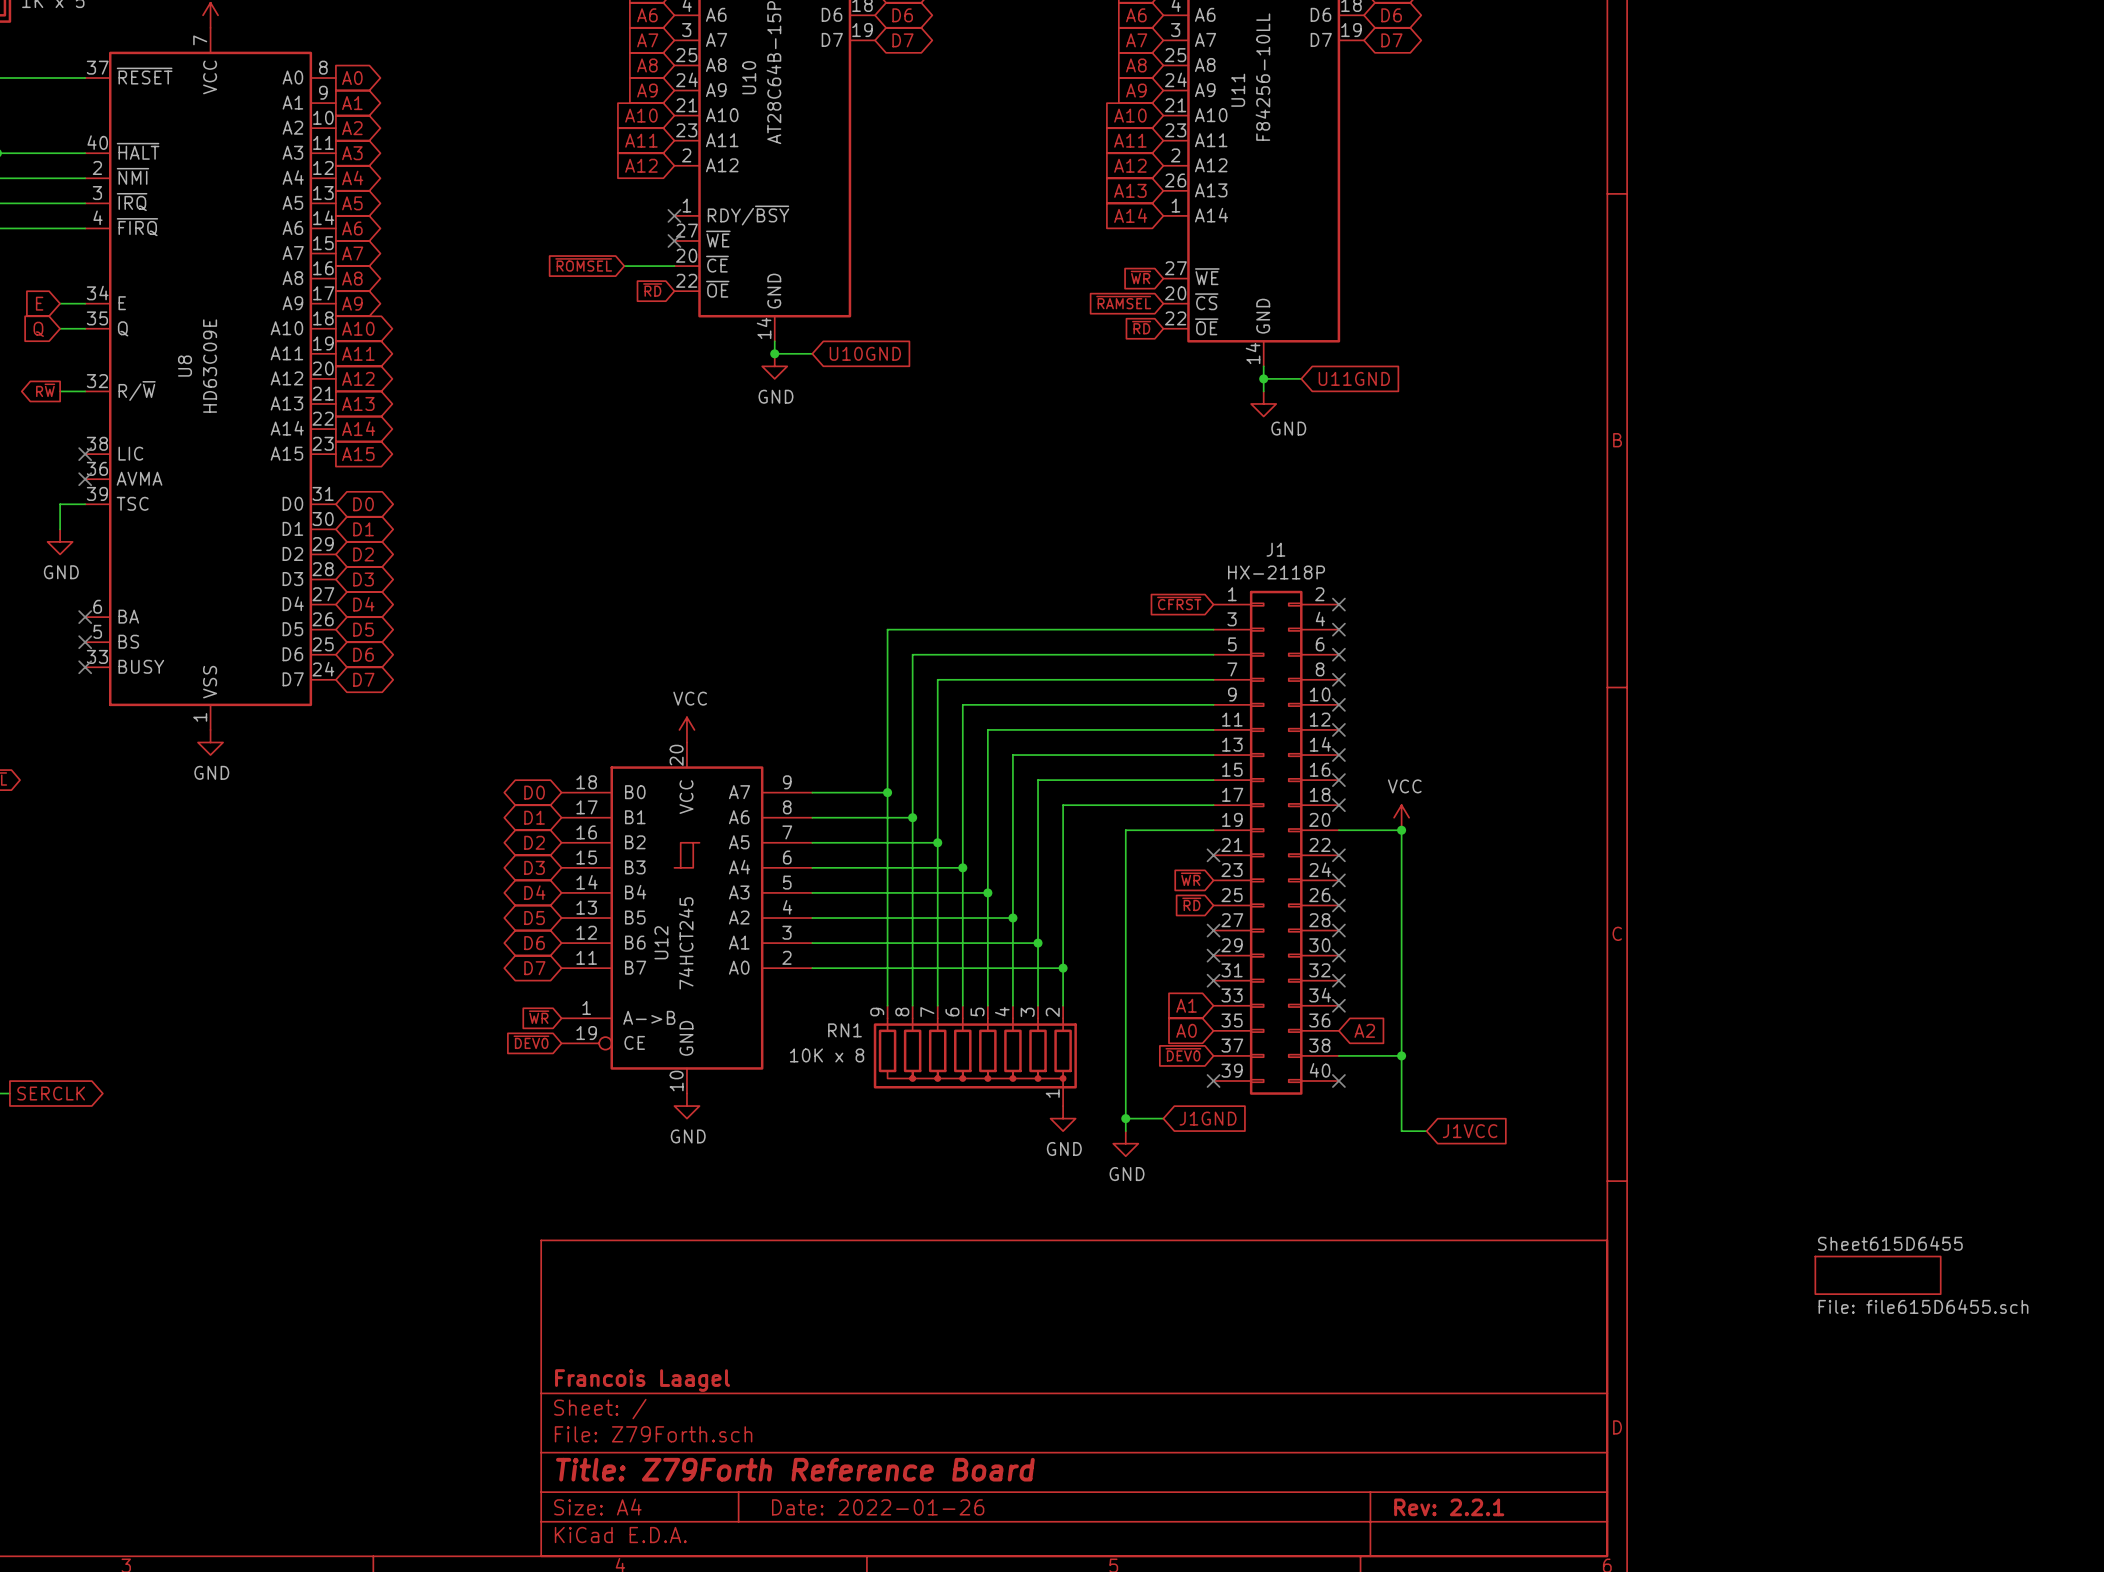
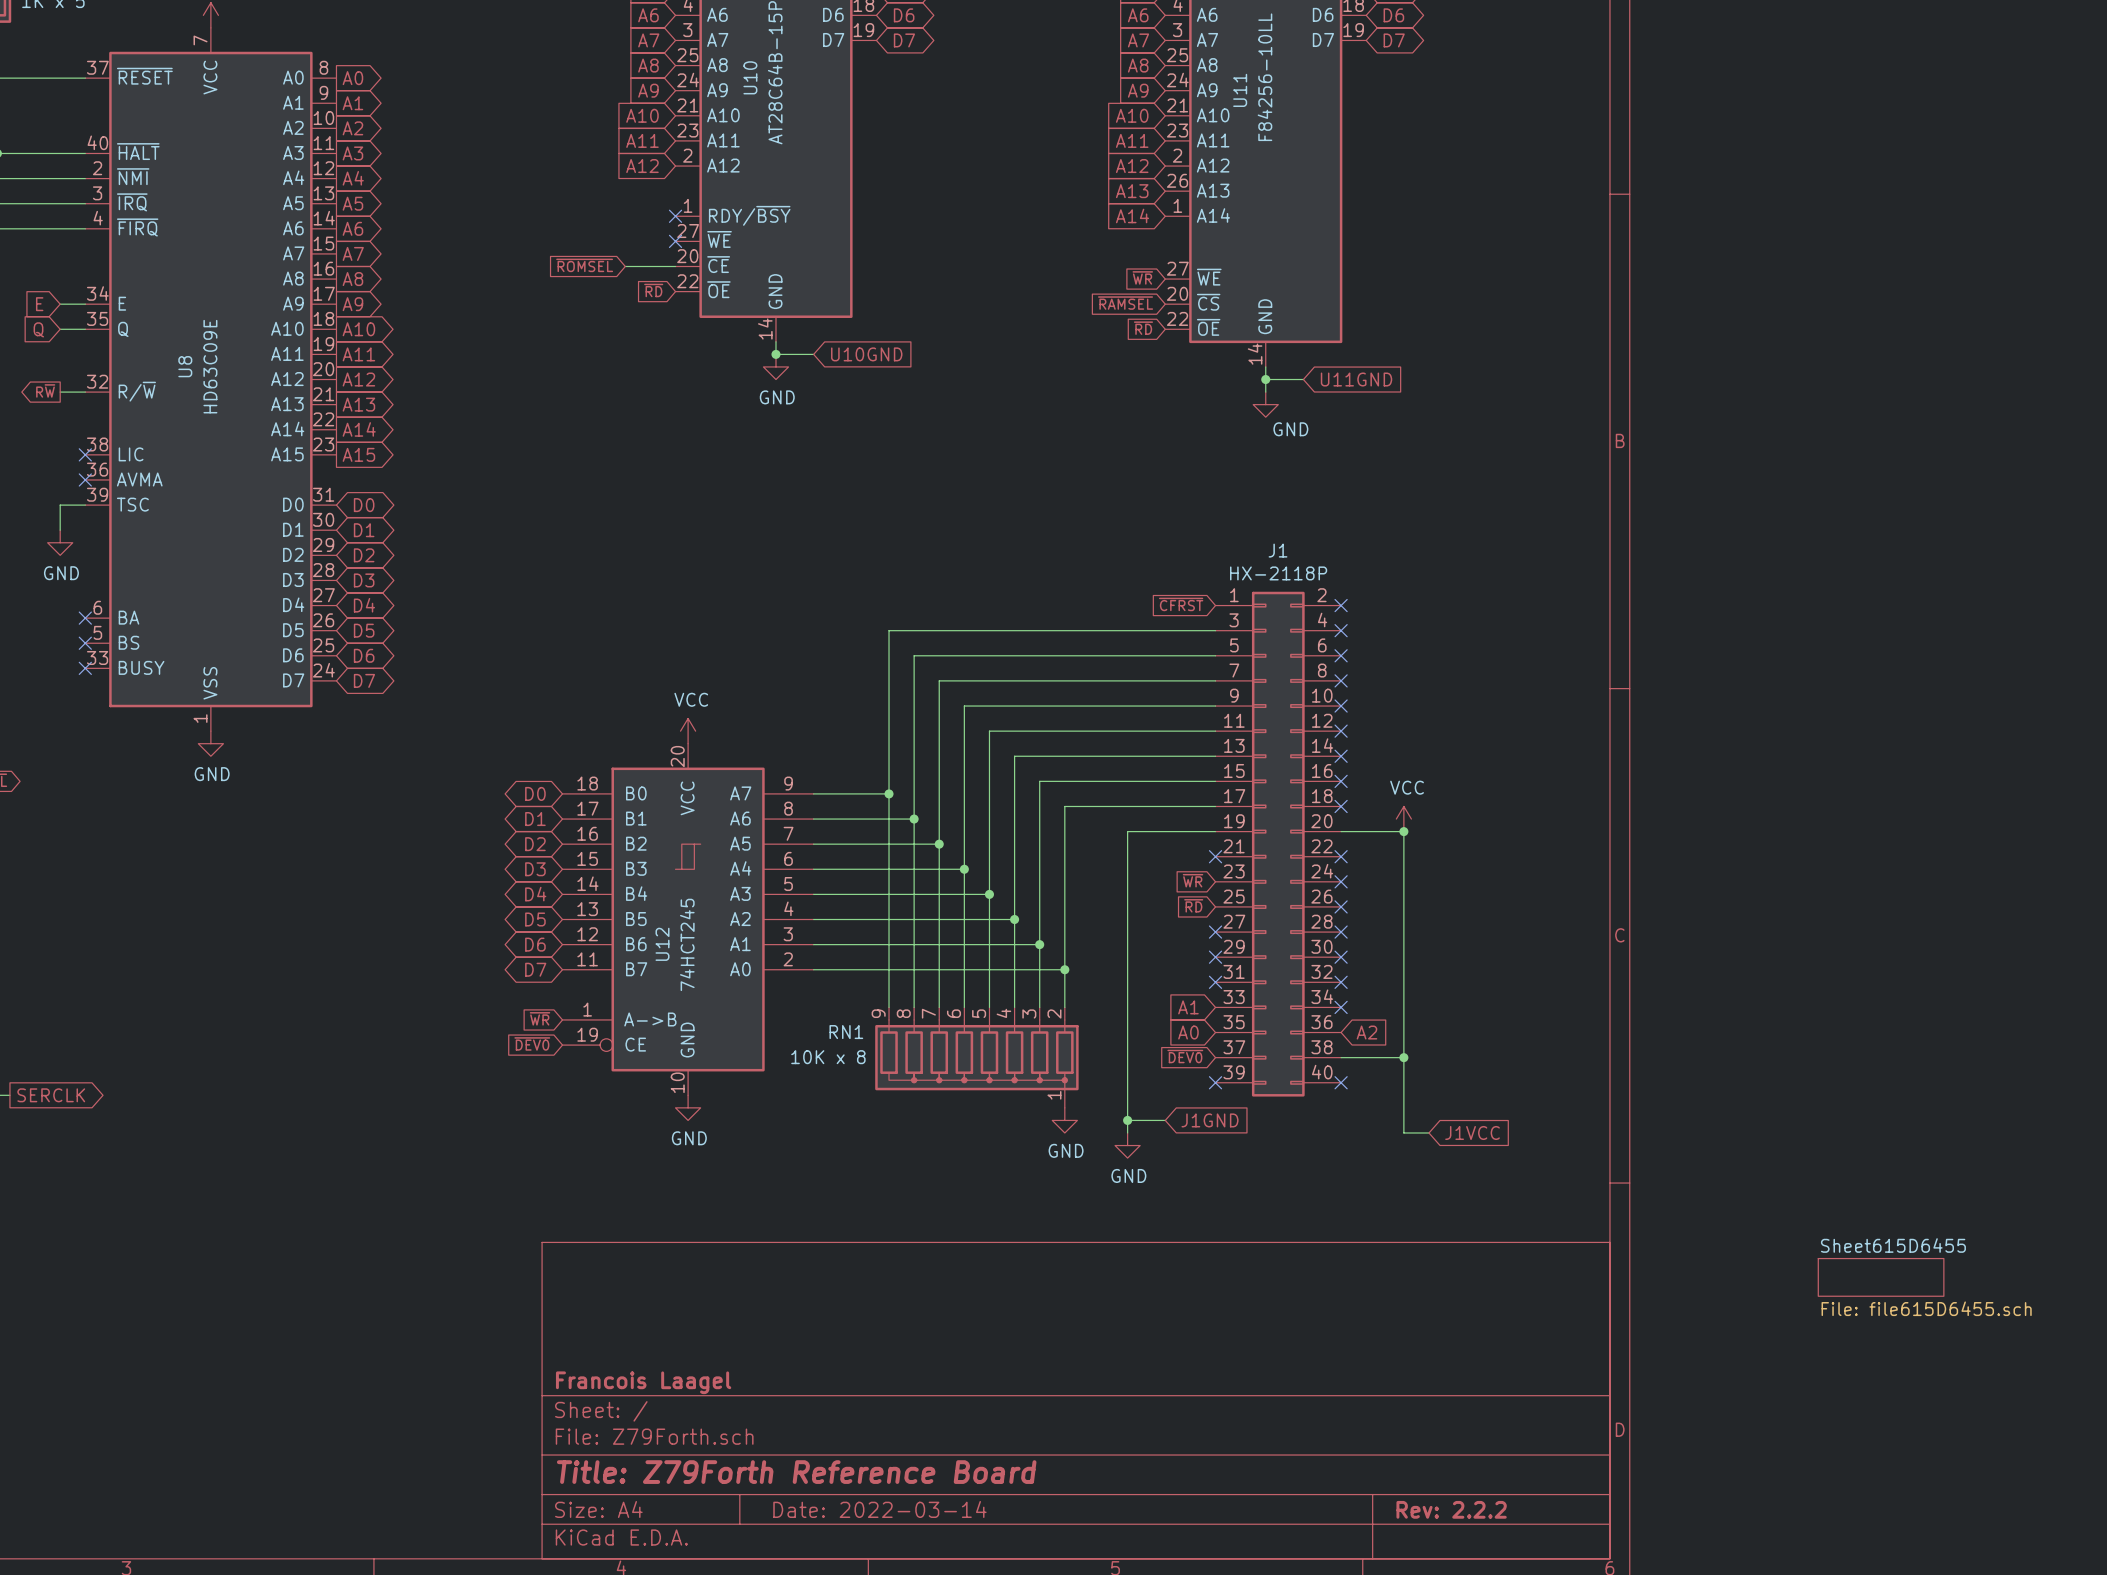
title block: Date: 2022-01-26 (878, 1507) -> Date: 2022-03-14 (879, 1509)
title block: Rev: 2.2.1 (1449, 1507) -> Rev: 2.2.2 (1451, 1509)

